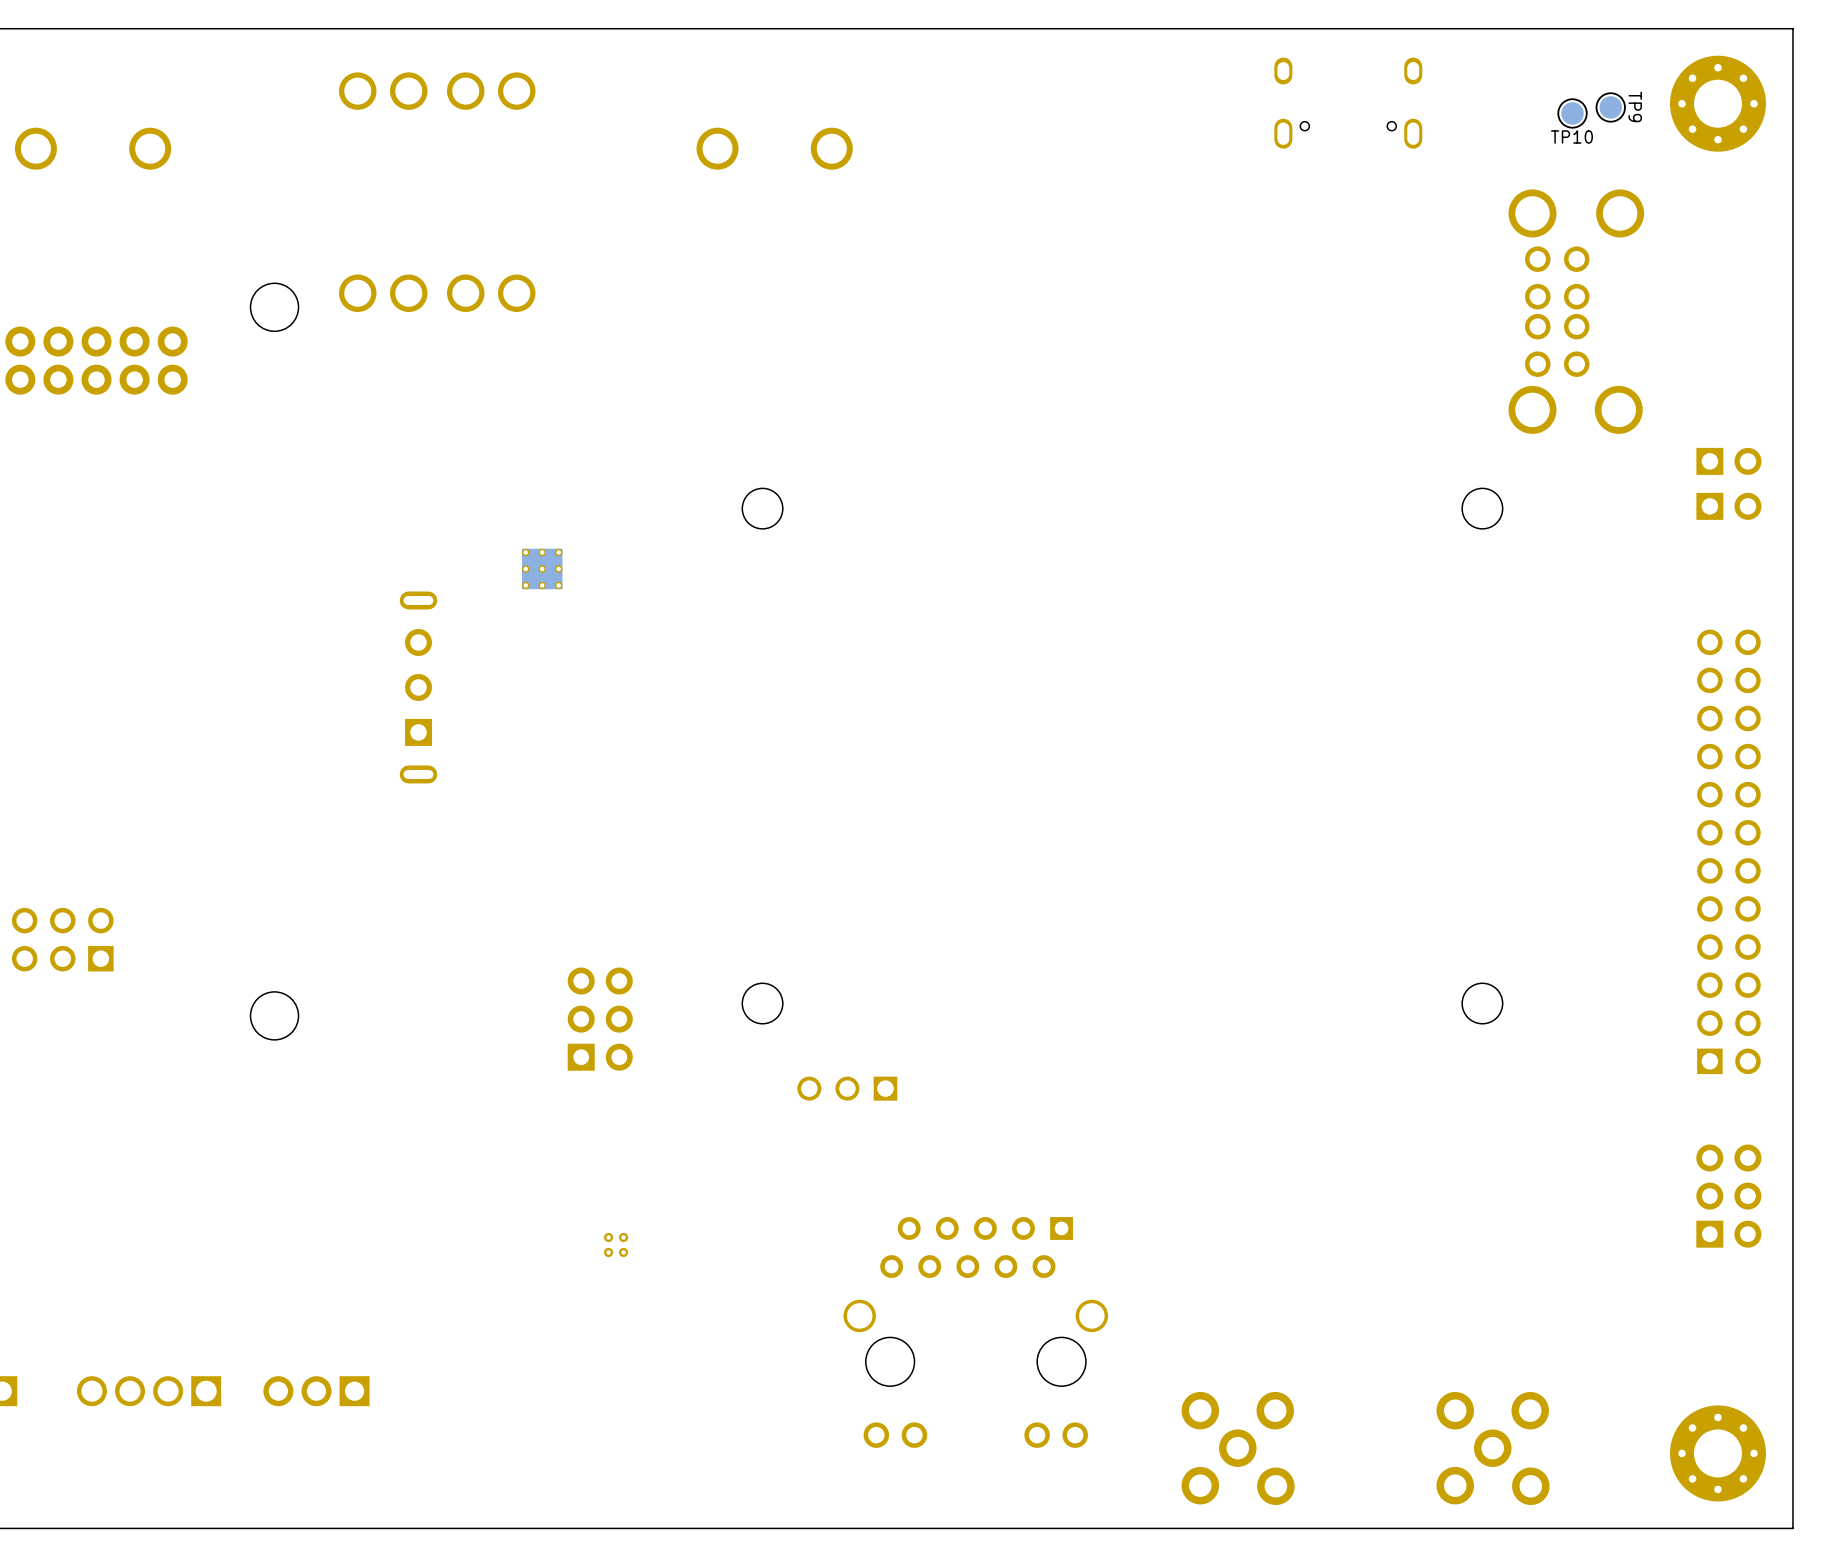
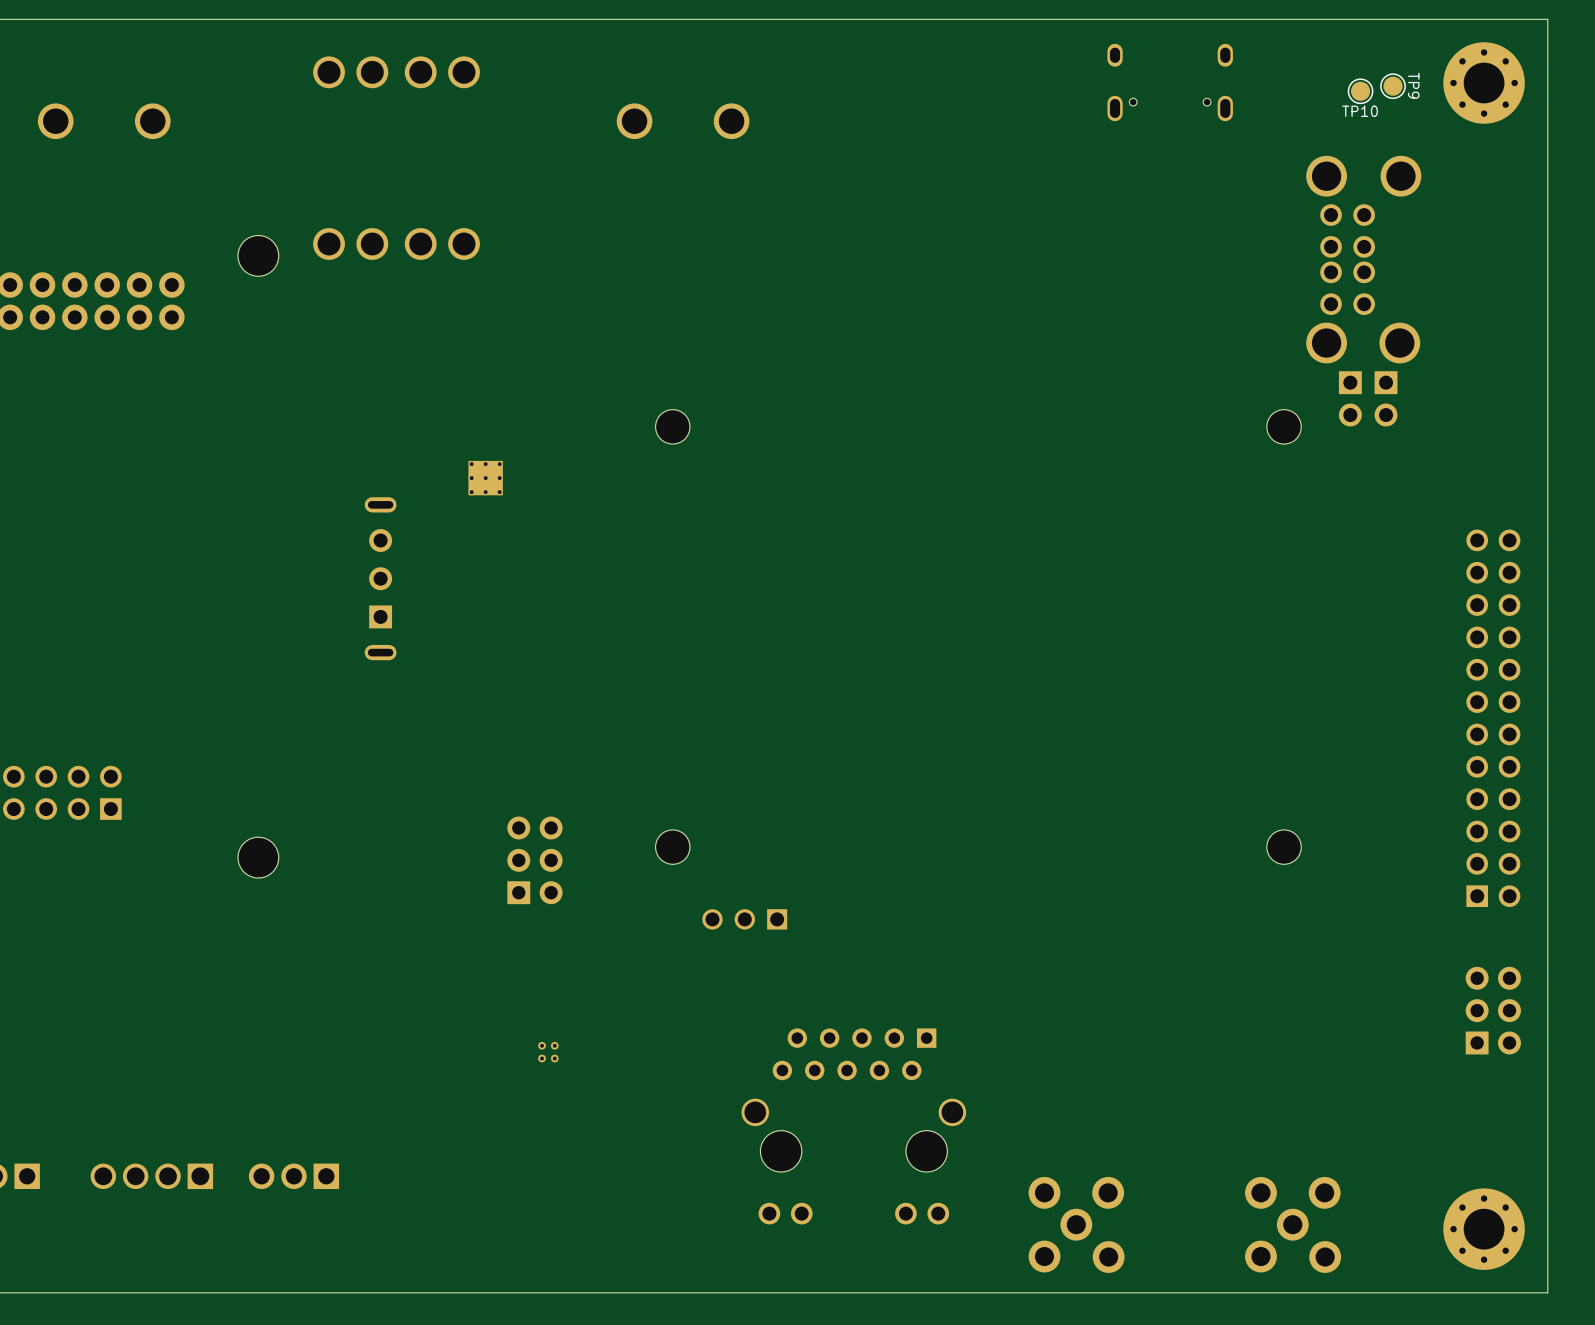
part: (1728, 461) -> none
part: none -> (1350, 398)
part: none -> (1386, 398)
part: (1728, 506) -> none

